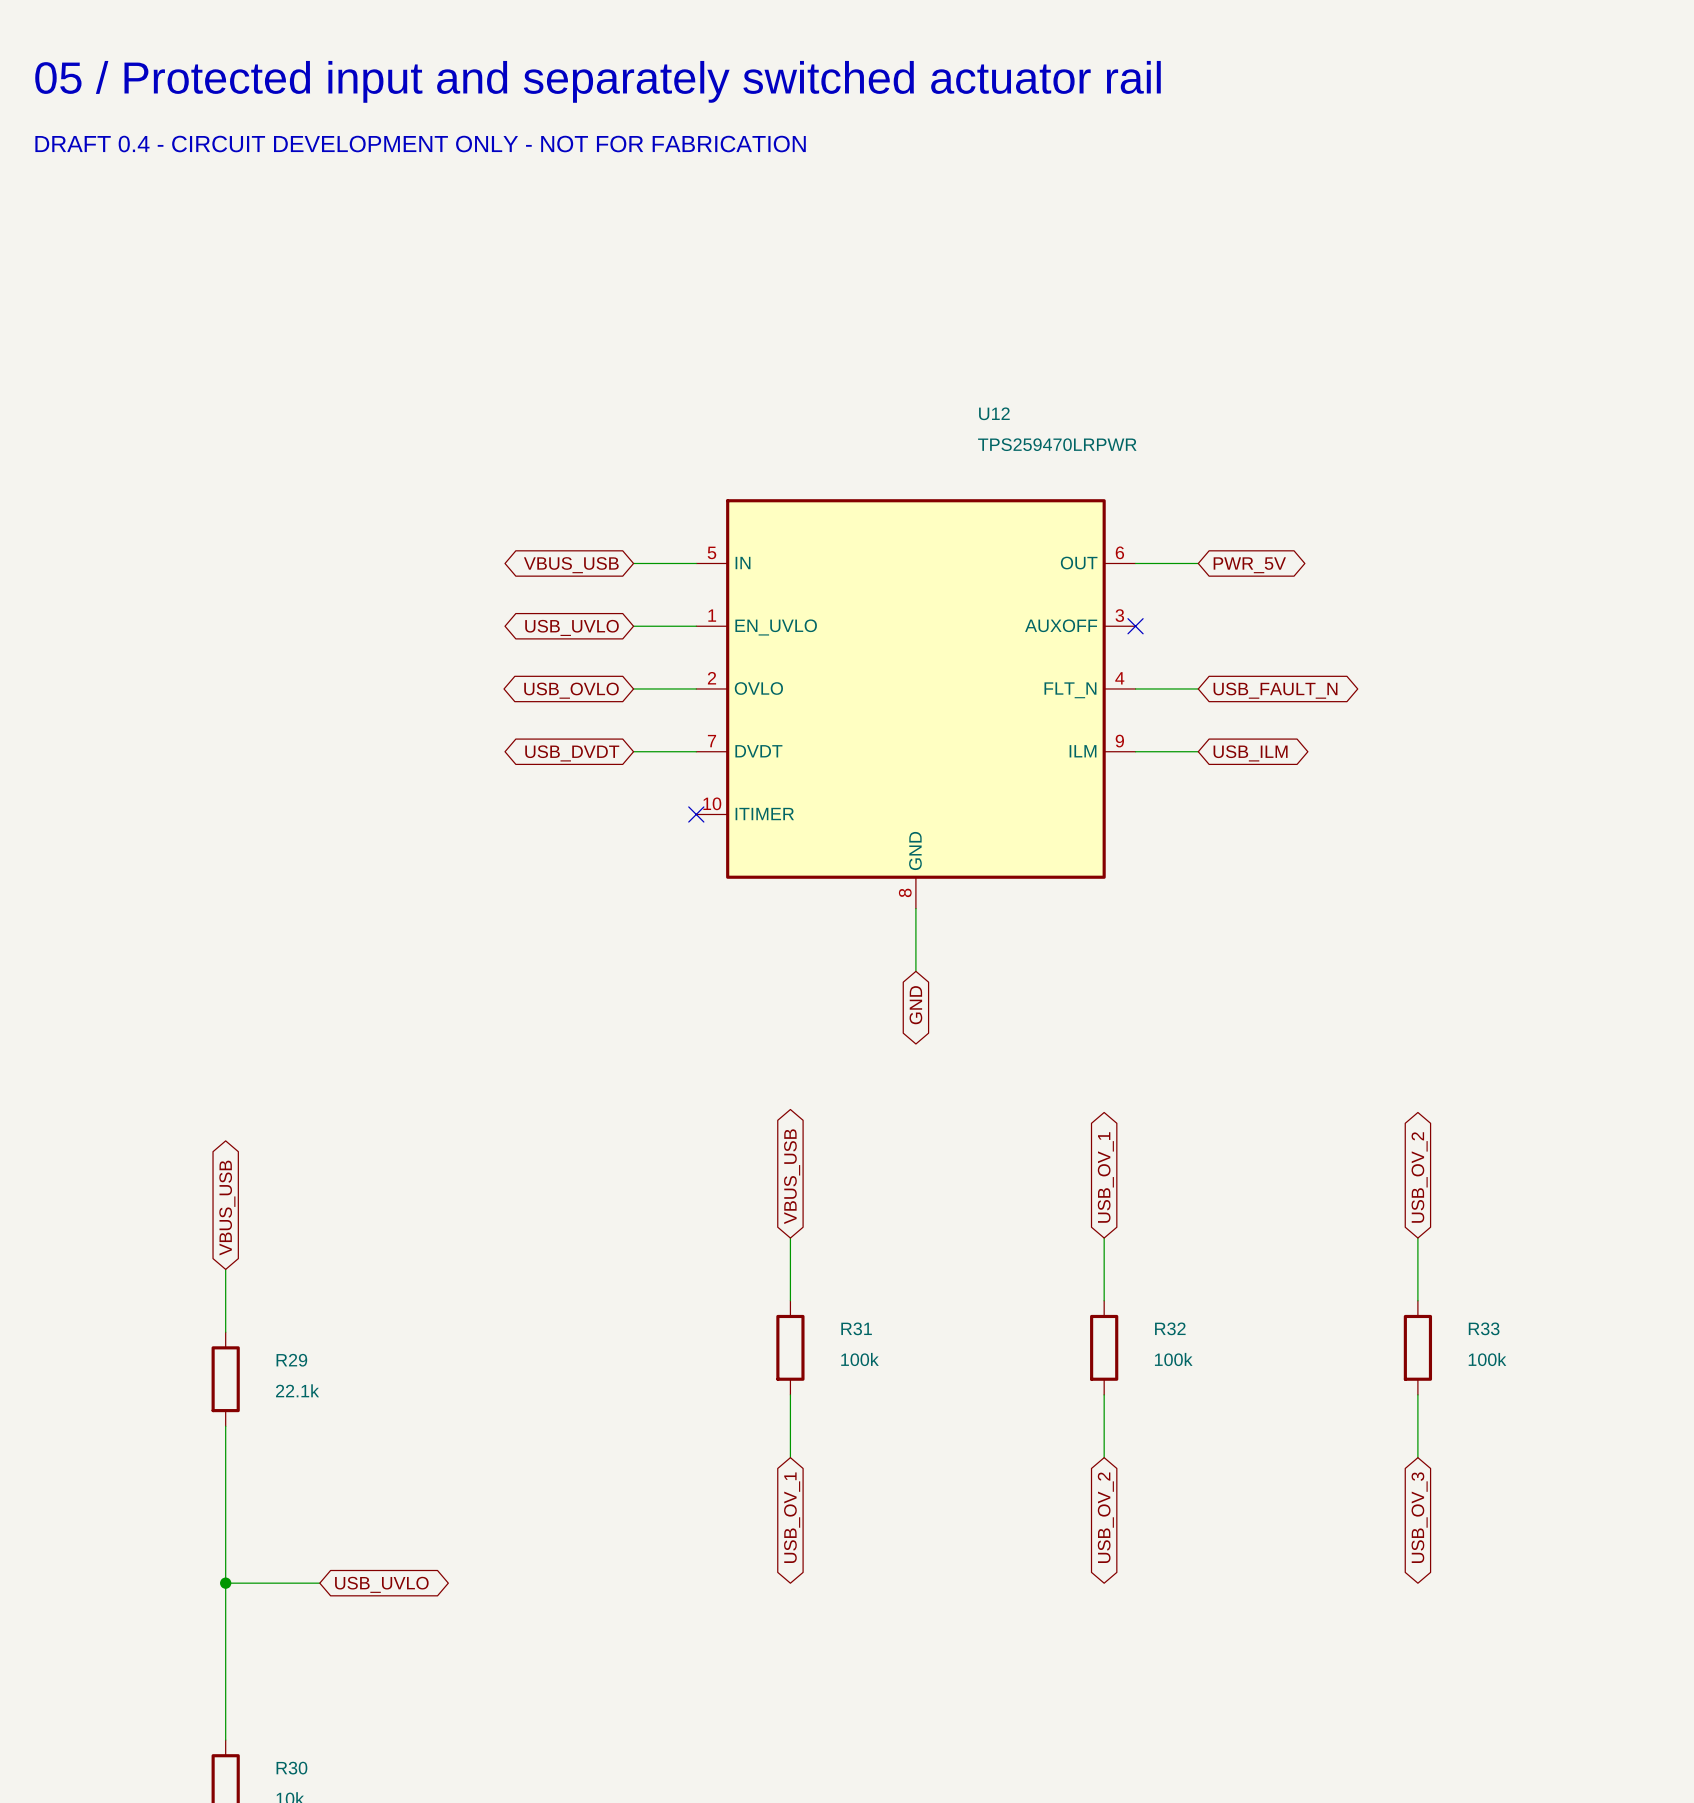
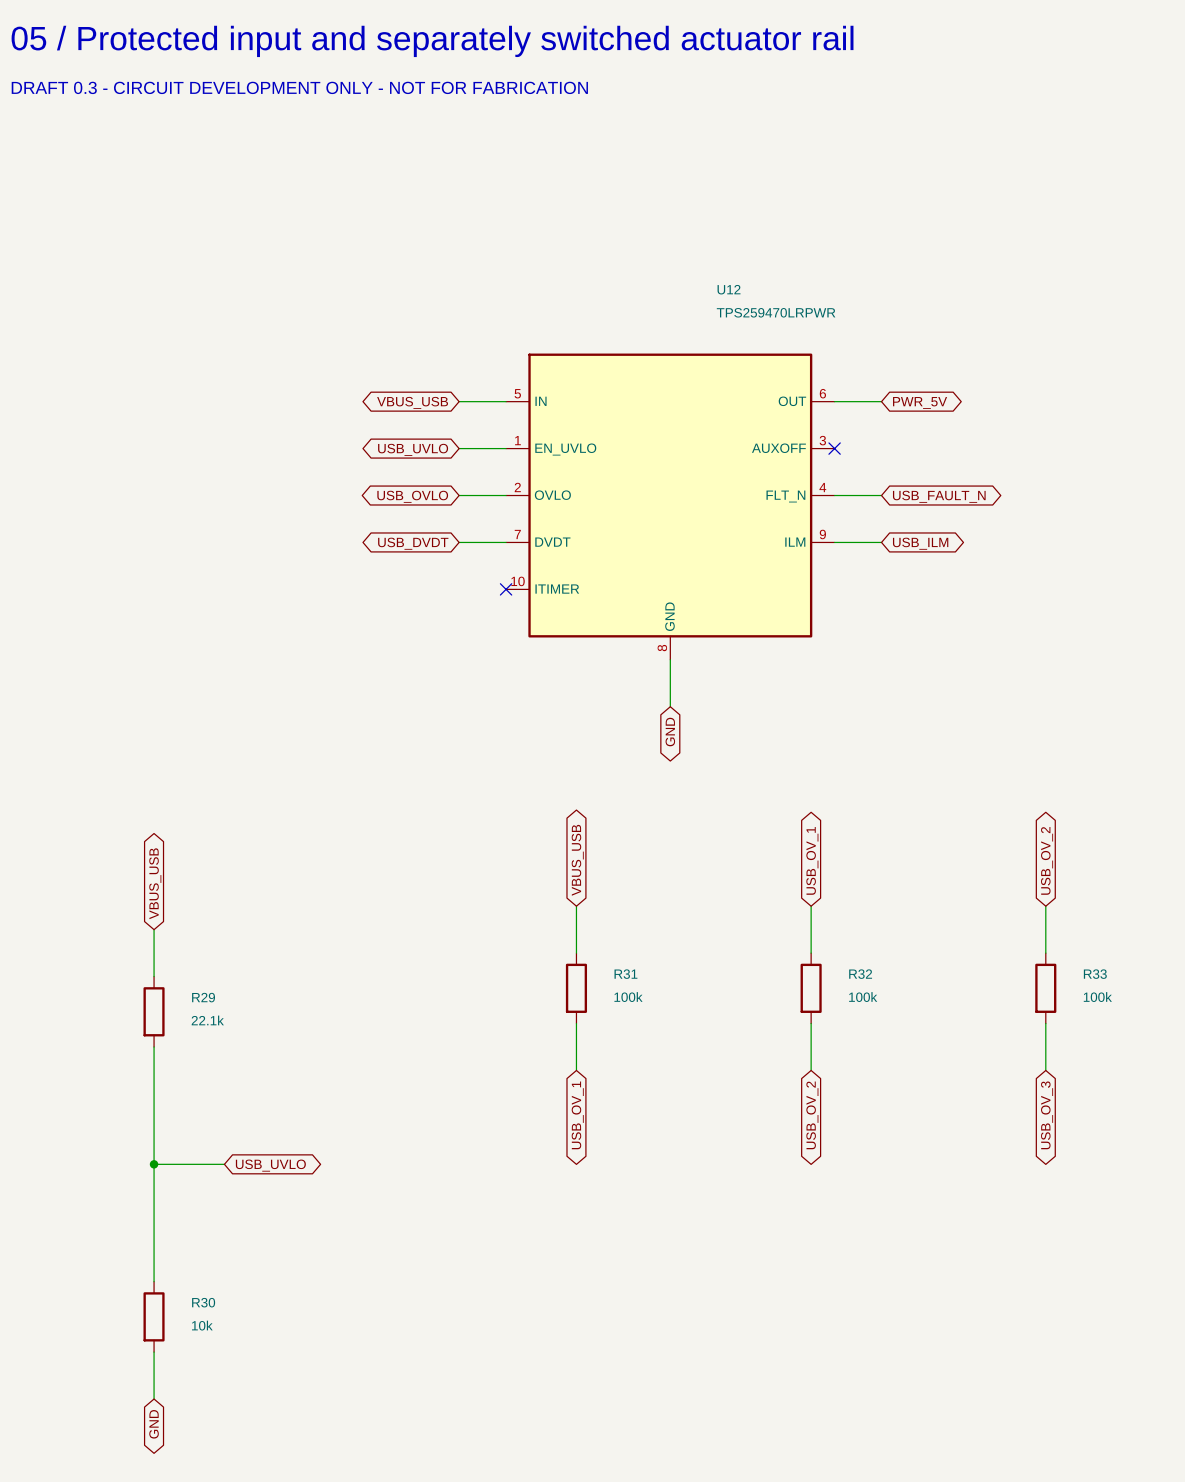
text: DRAFT 0.4 - CIRCUIT DEVELOPMENT ONLY - NOT FOR FABRICATION (420, 144) -> DRAFT 0.3 - CIRCUIT DEVELOPMENT ONLY - NOT FOR FABRICATION (299, 87)

